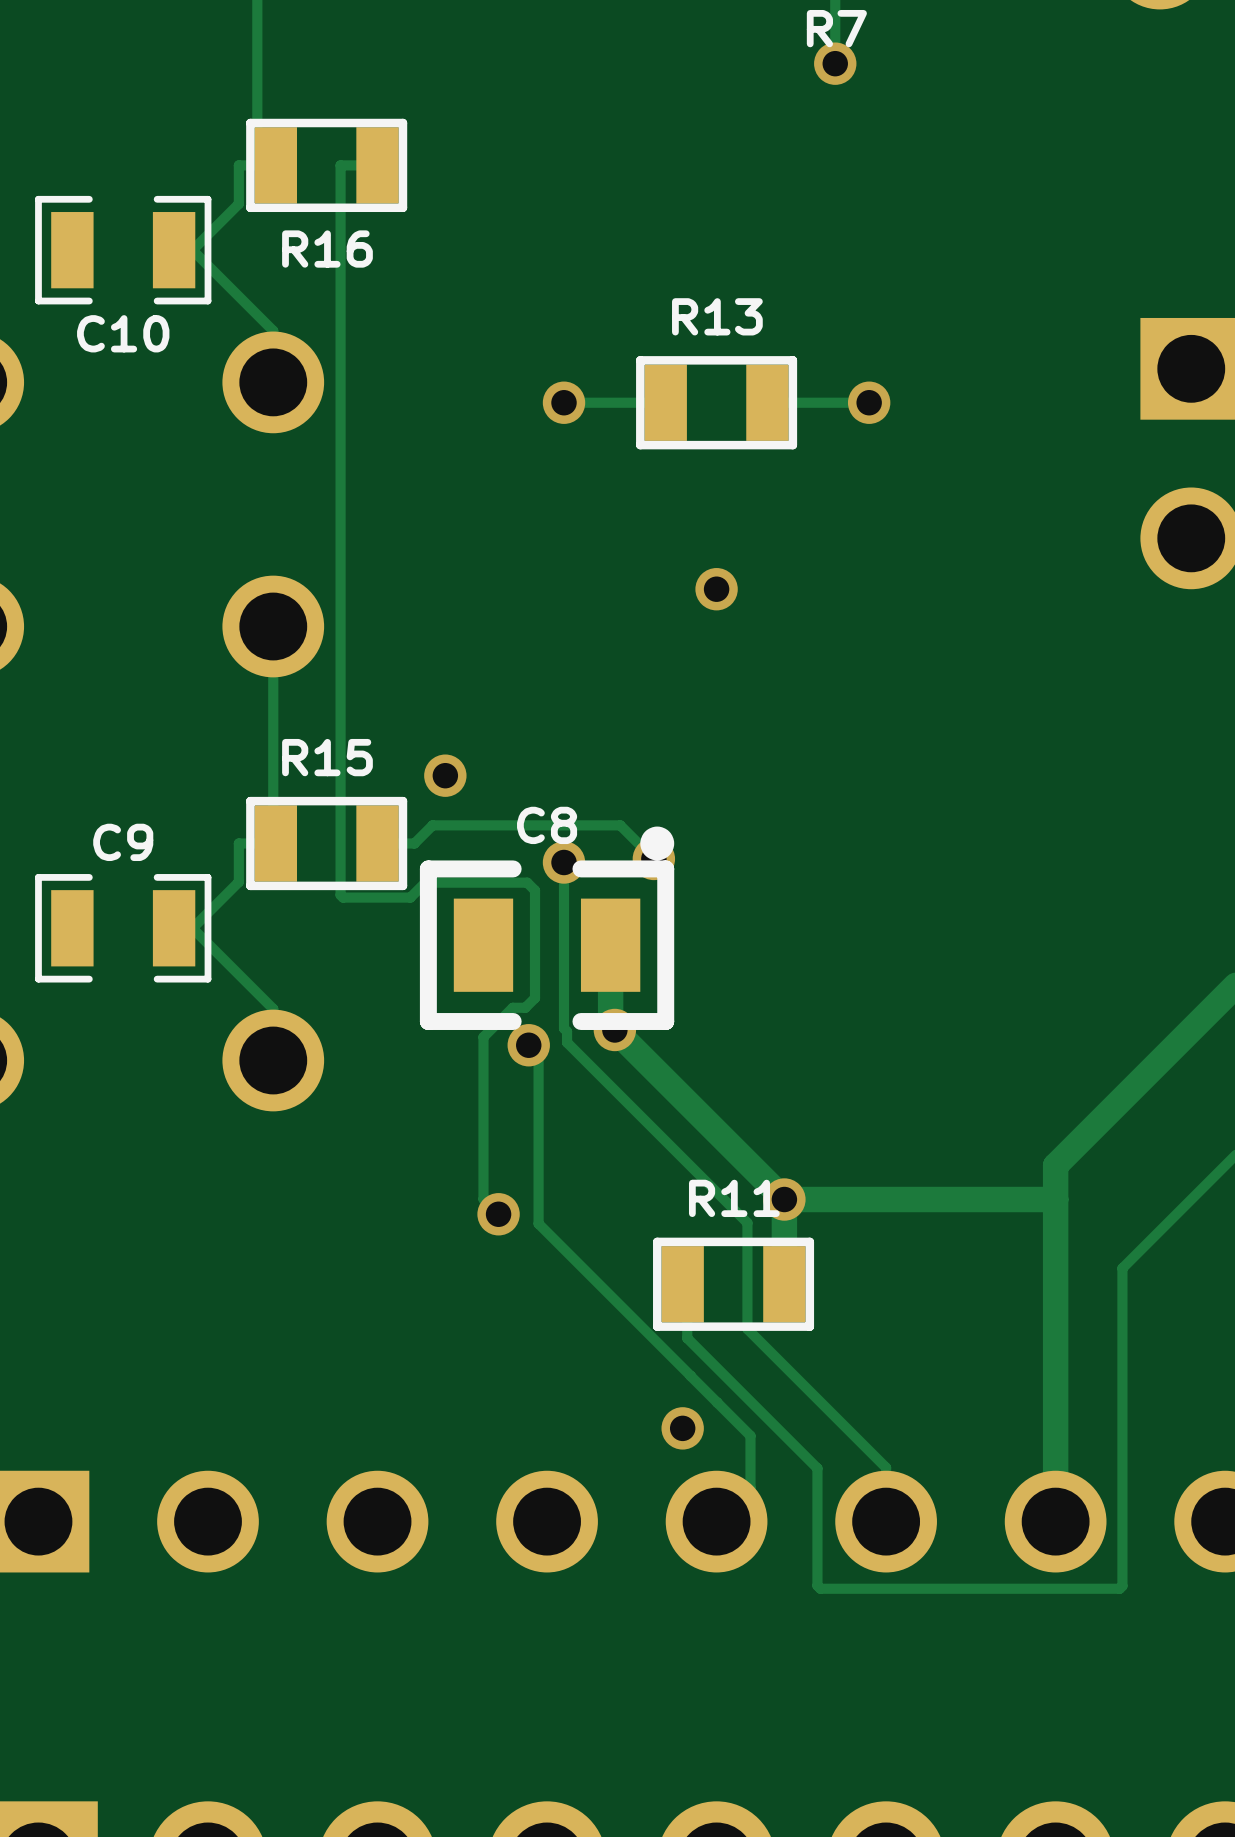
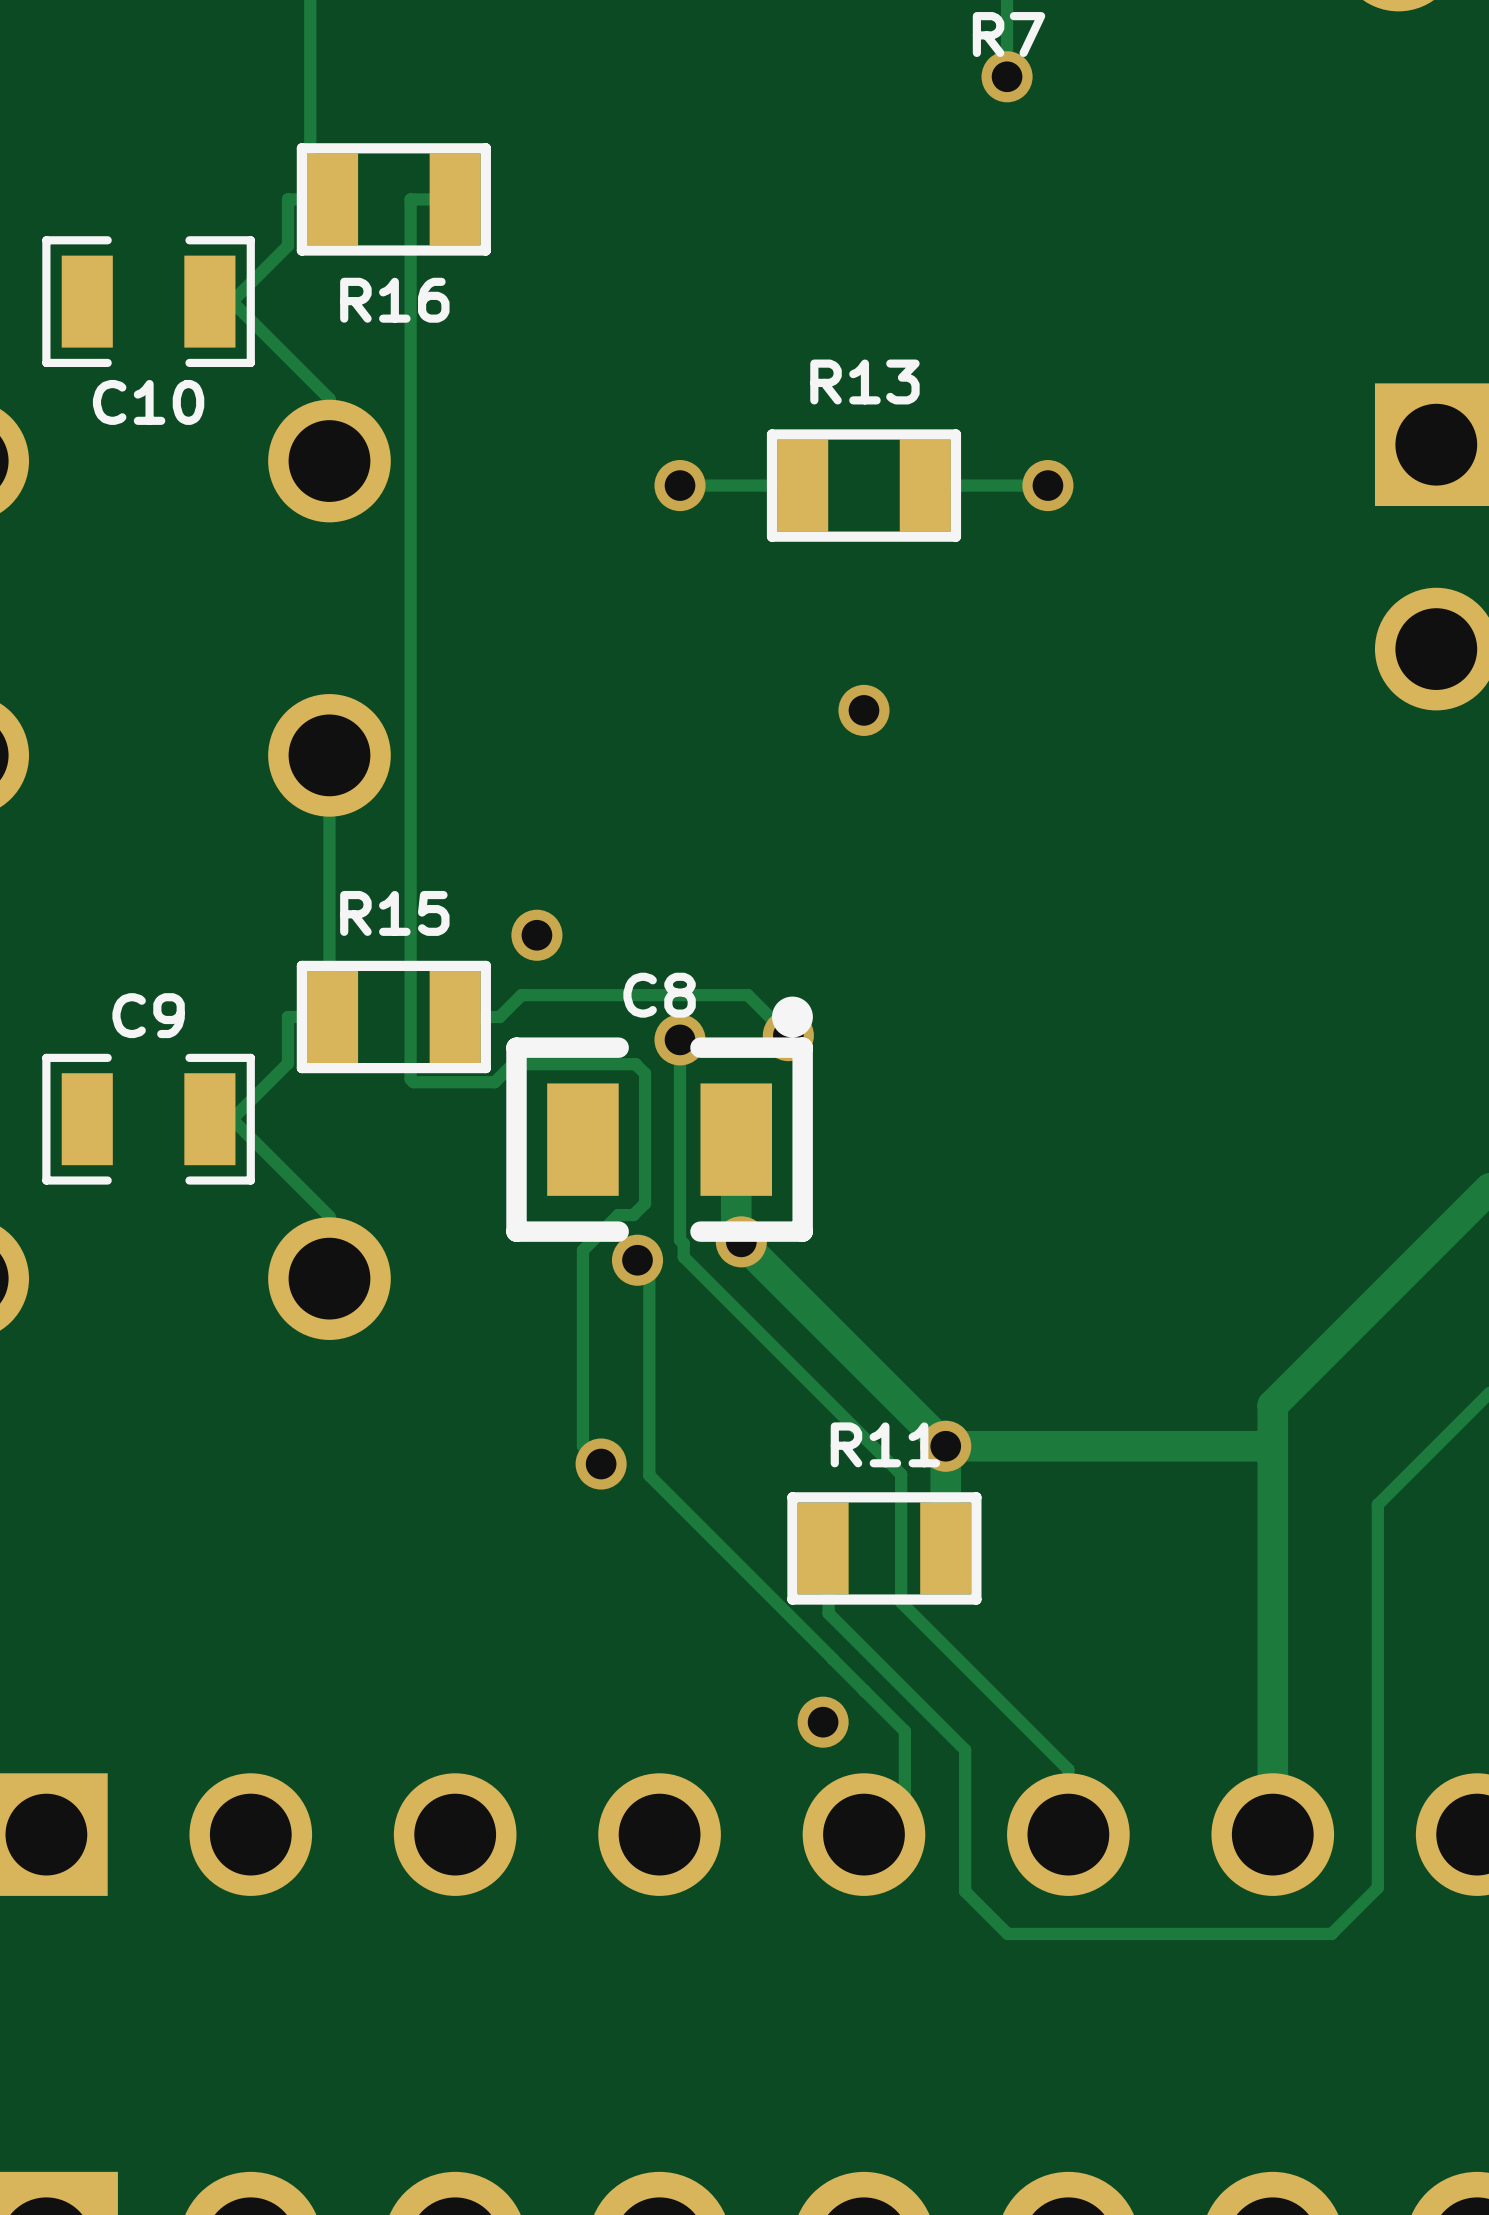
track: (1142, 1248) (1122, 1268) (1122, 1586) -> (1377, 1504) (1377, 1887) (1353, 1912)
track: (800, 1451) (817, 1468) (817, 1585) -> (965, 1749) (965, 1891) (985, 1911)
track: (1119, 1588) (820, 1588) -> (1350, 1915) (1331, 1933) (1007, 1933) (989, 1915)

